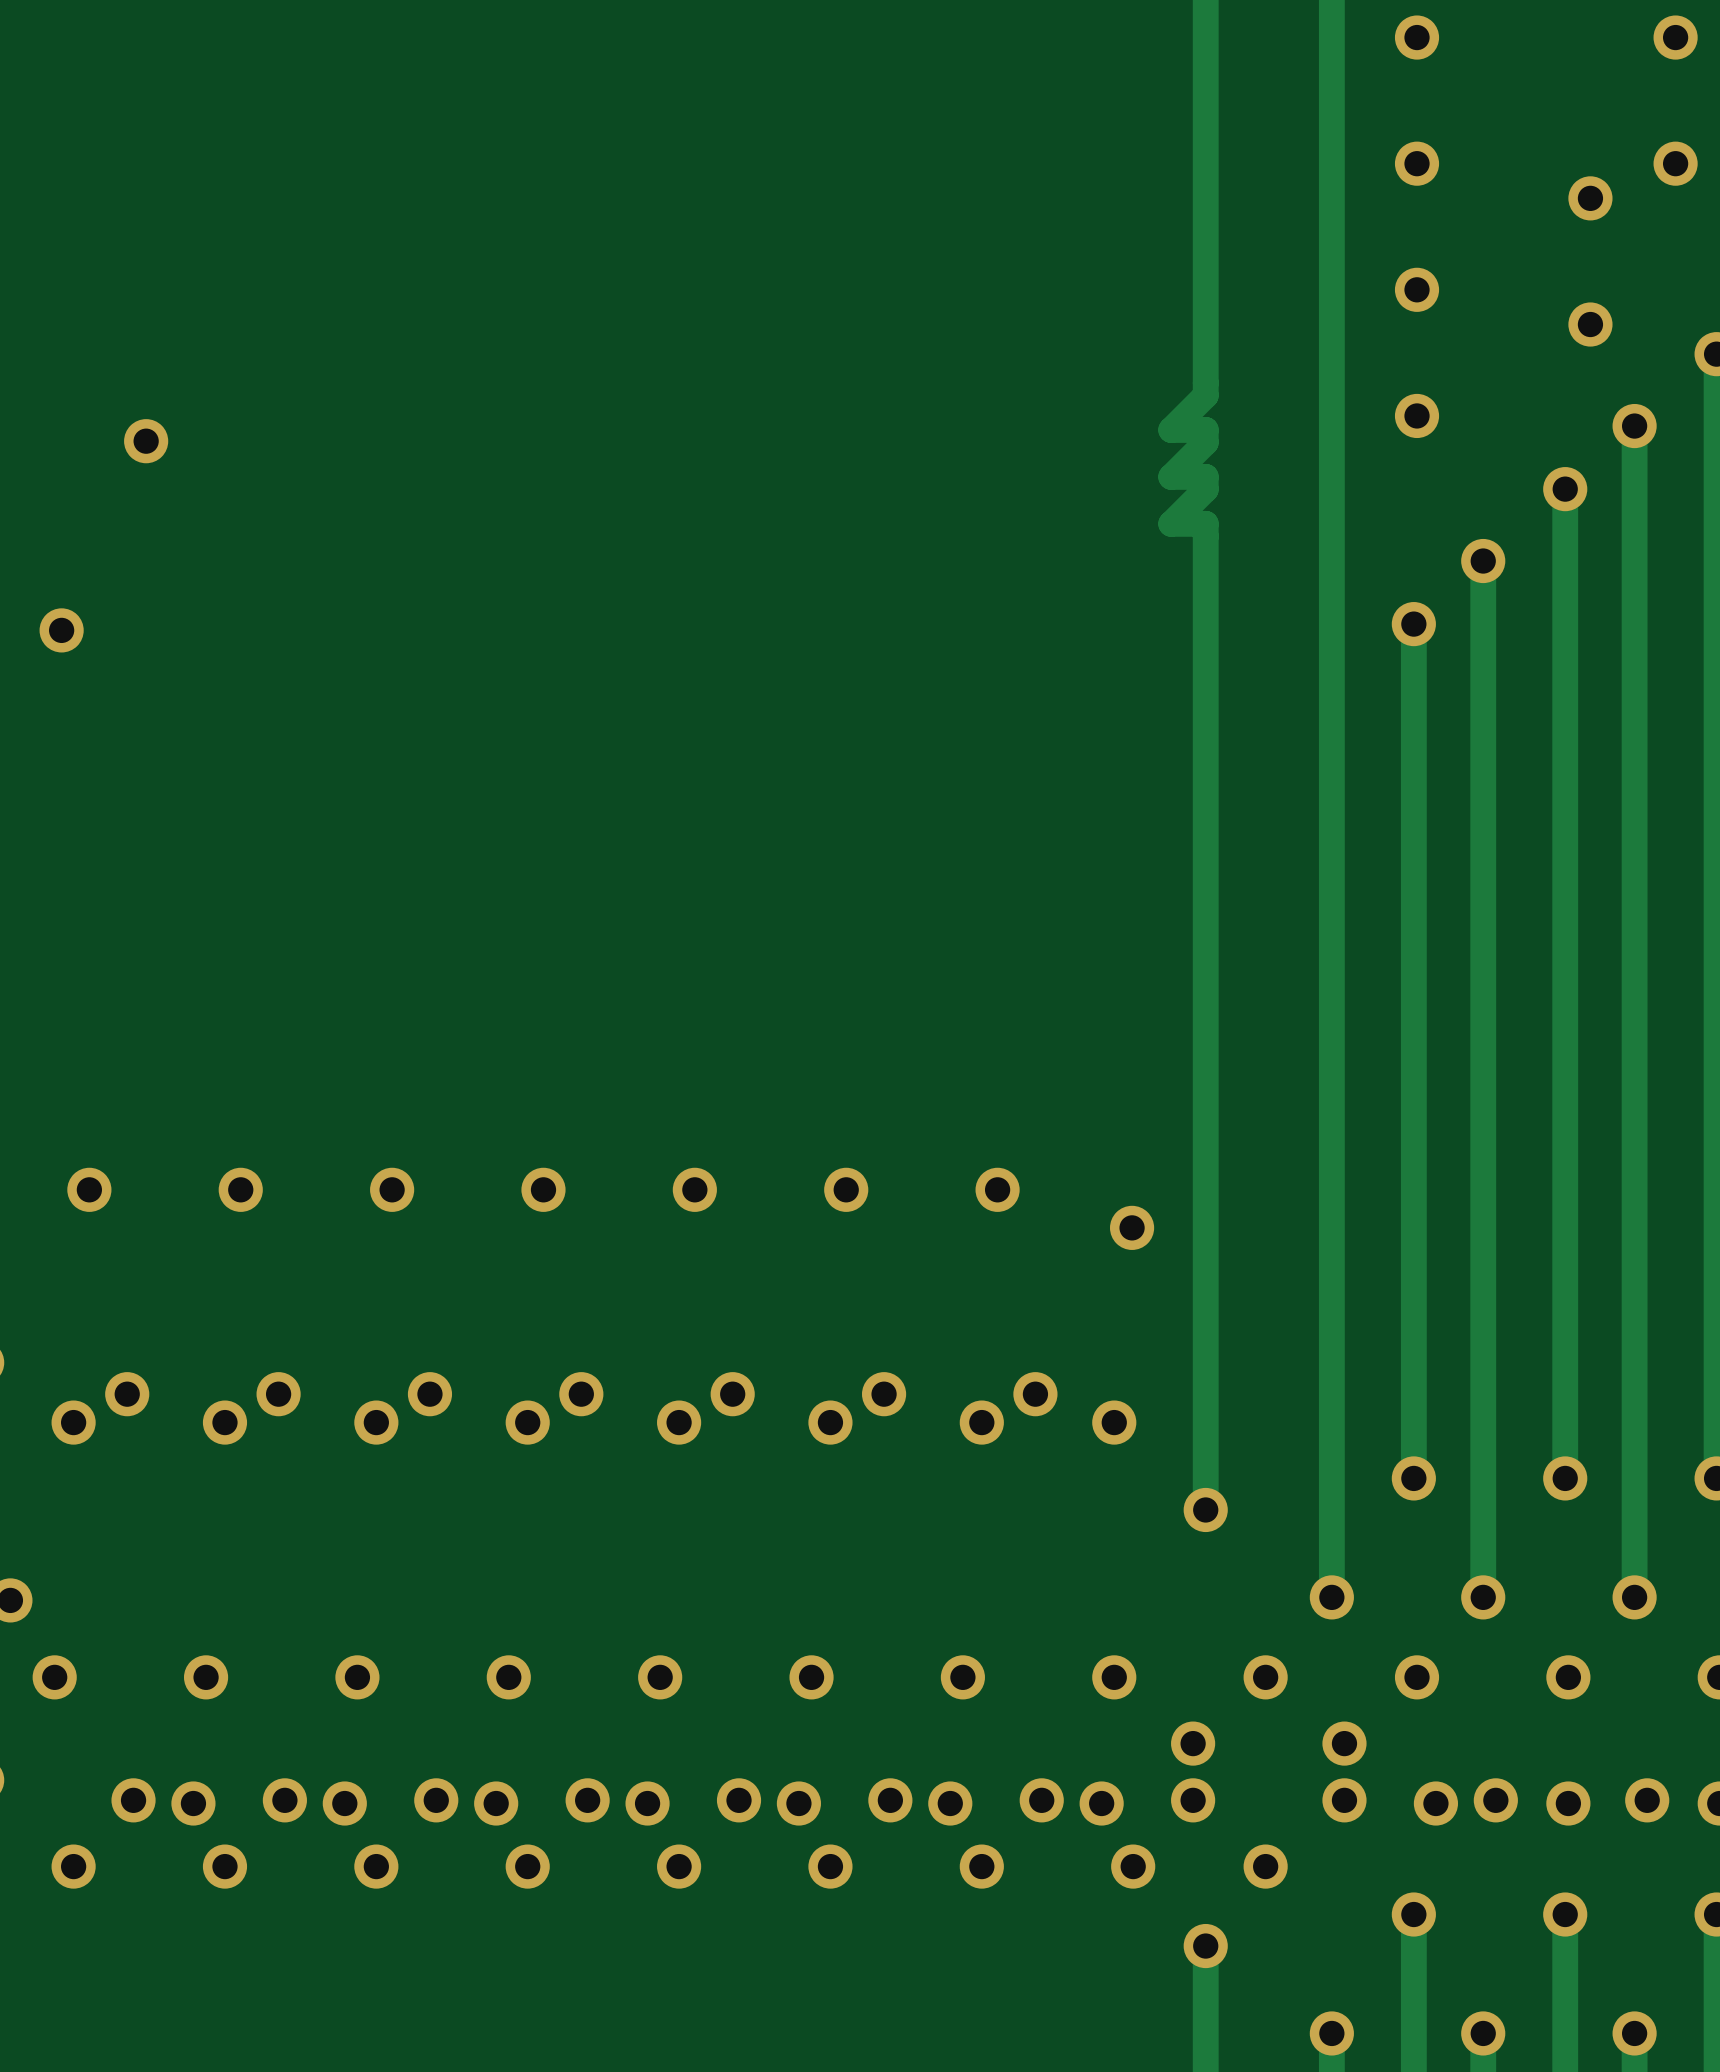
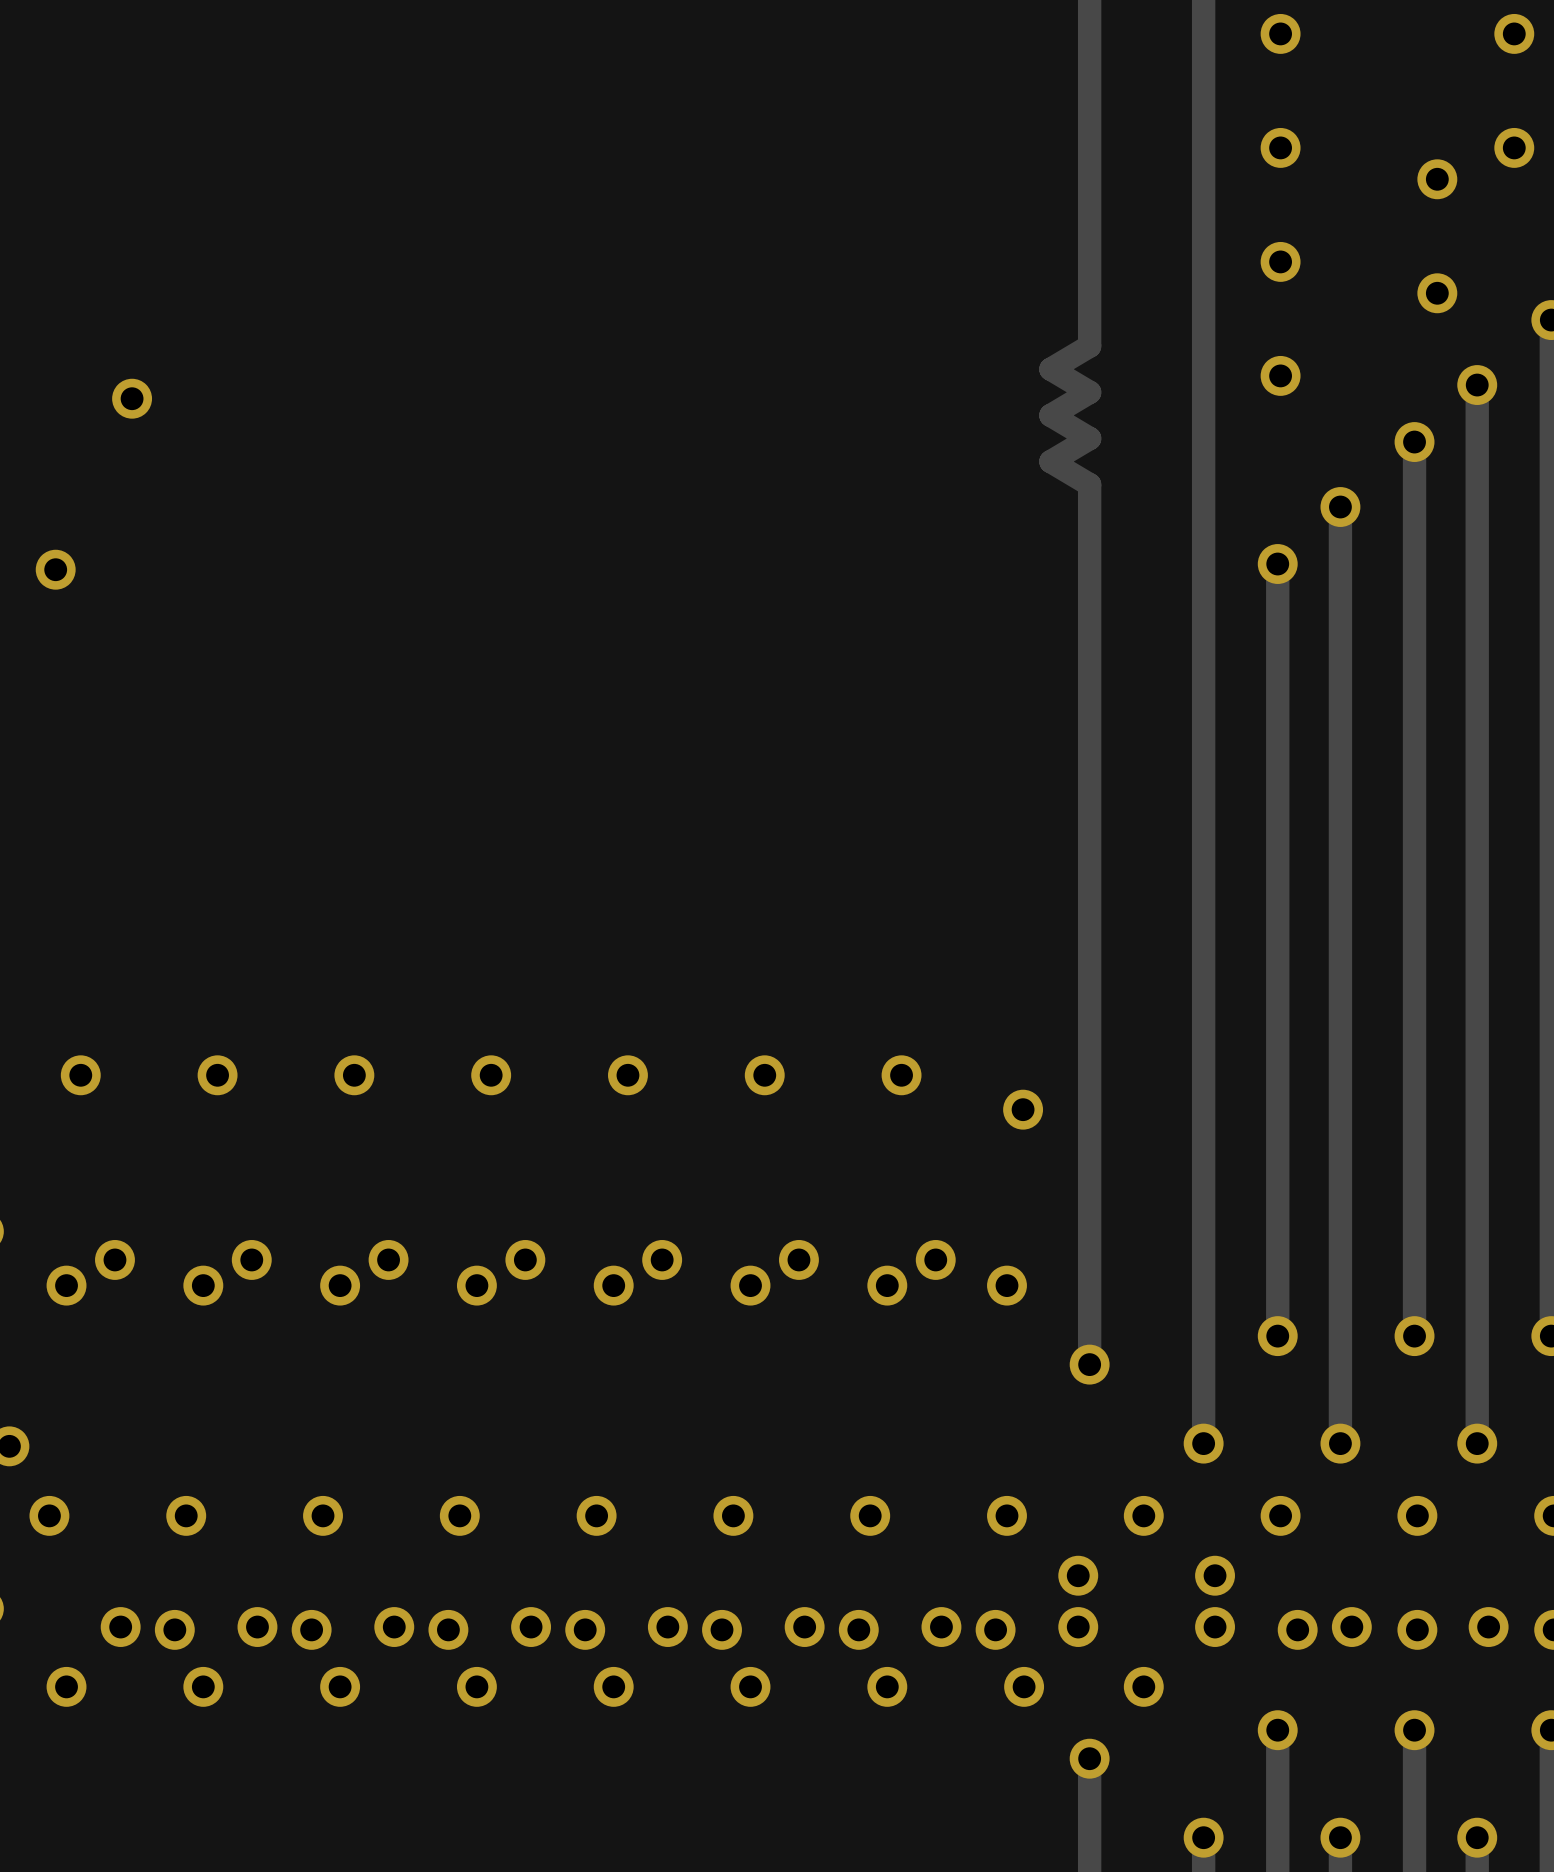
track: (1205, 383) (1205, 395) (1171, 429) (1205, 429) (1205, 442) (1171, 476) (1205, 476) (1205, 489) (1171, 523) (1205, 523) (1205, 536) -> (1089, 346) (1050, 369) (1089, 392) (1050, 415) (1089, 438) (1050, 461) (1089, 484)

